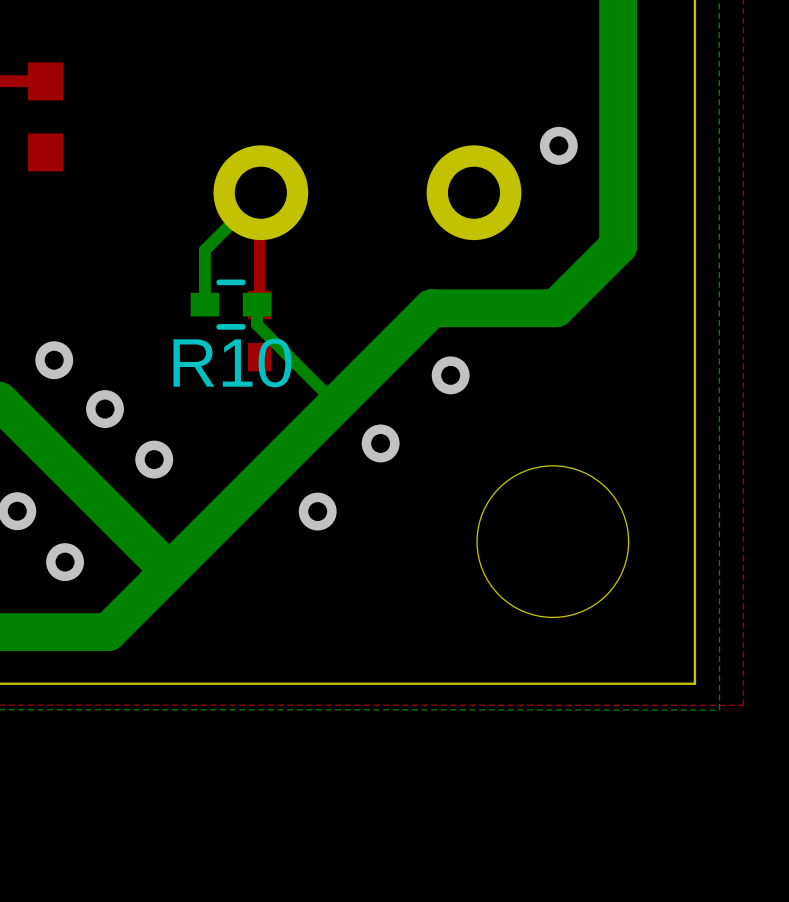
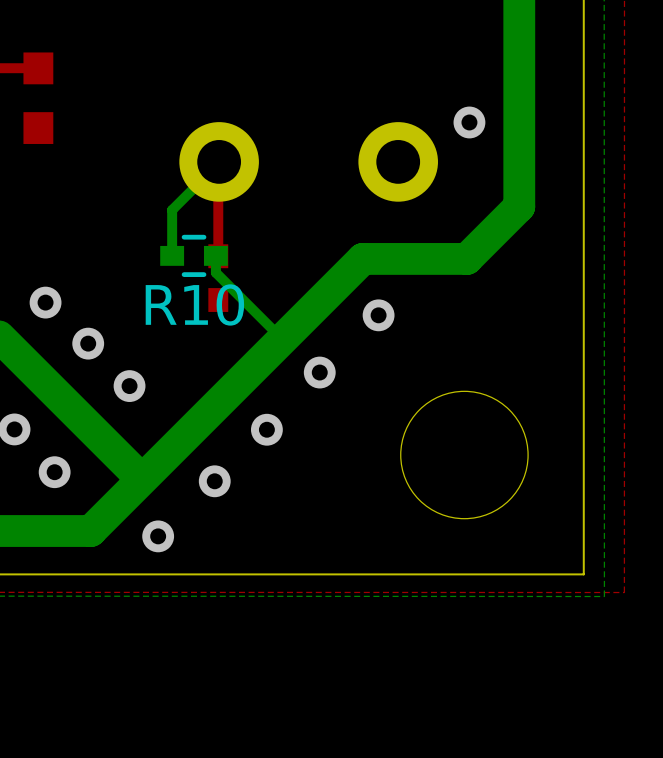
via: none -> (214, 481)
via: none -> (158, 536)

